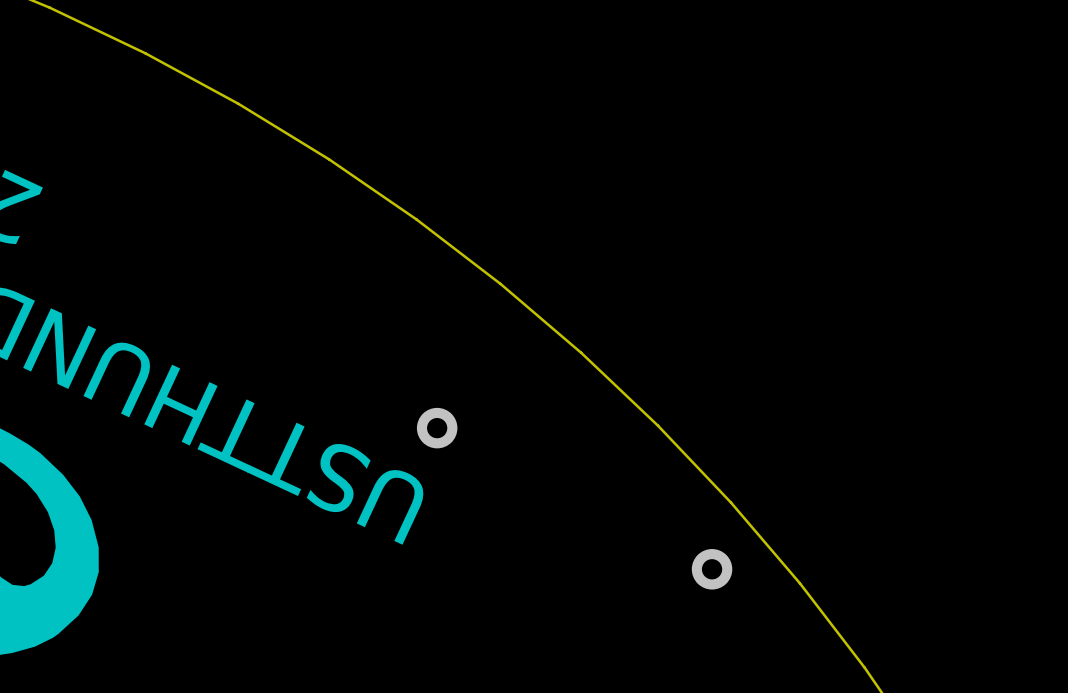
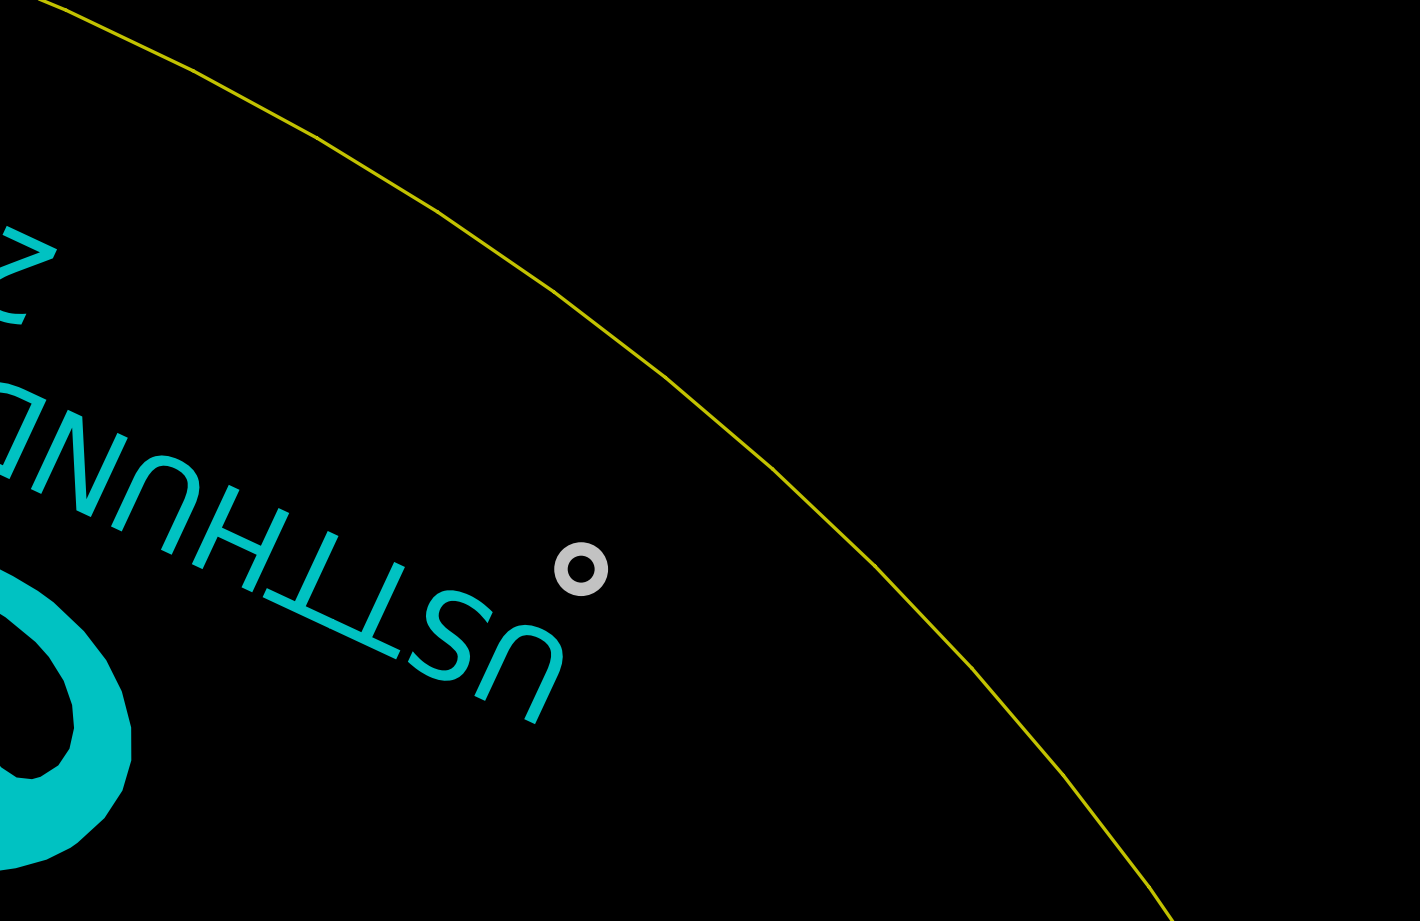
via: (712, 569) -> none

